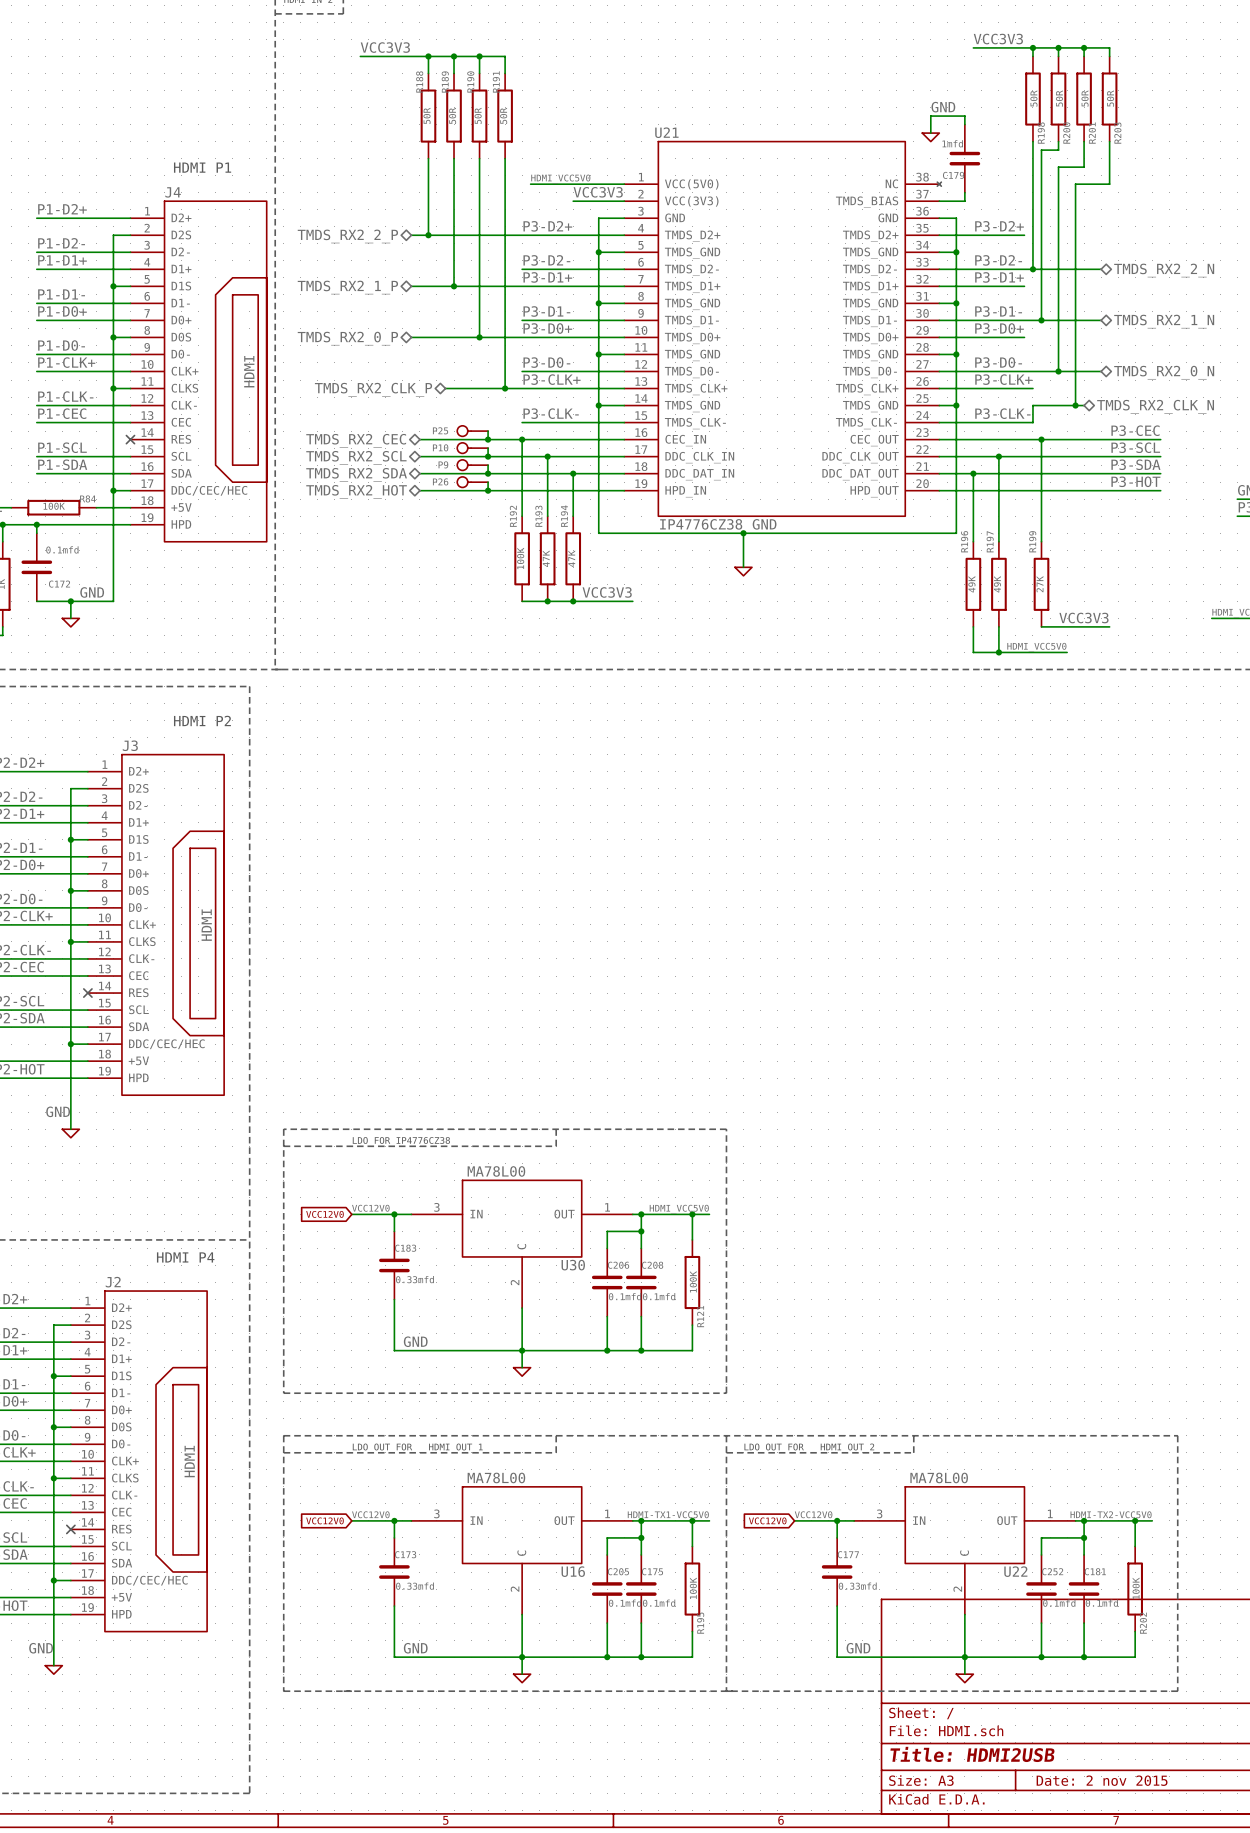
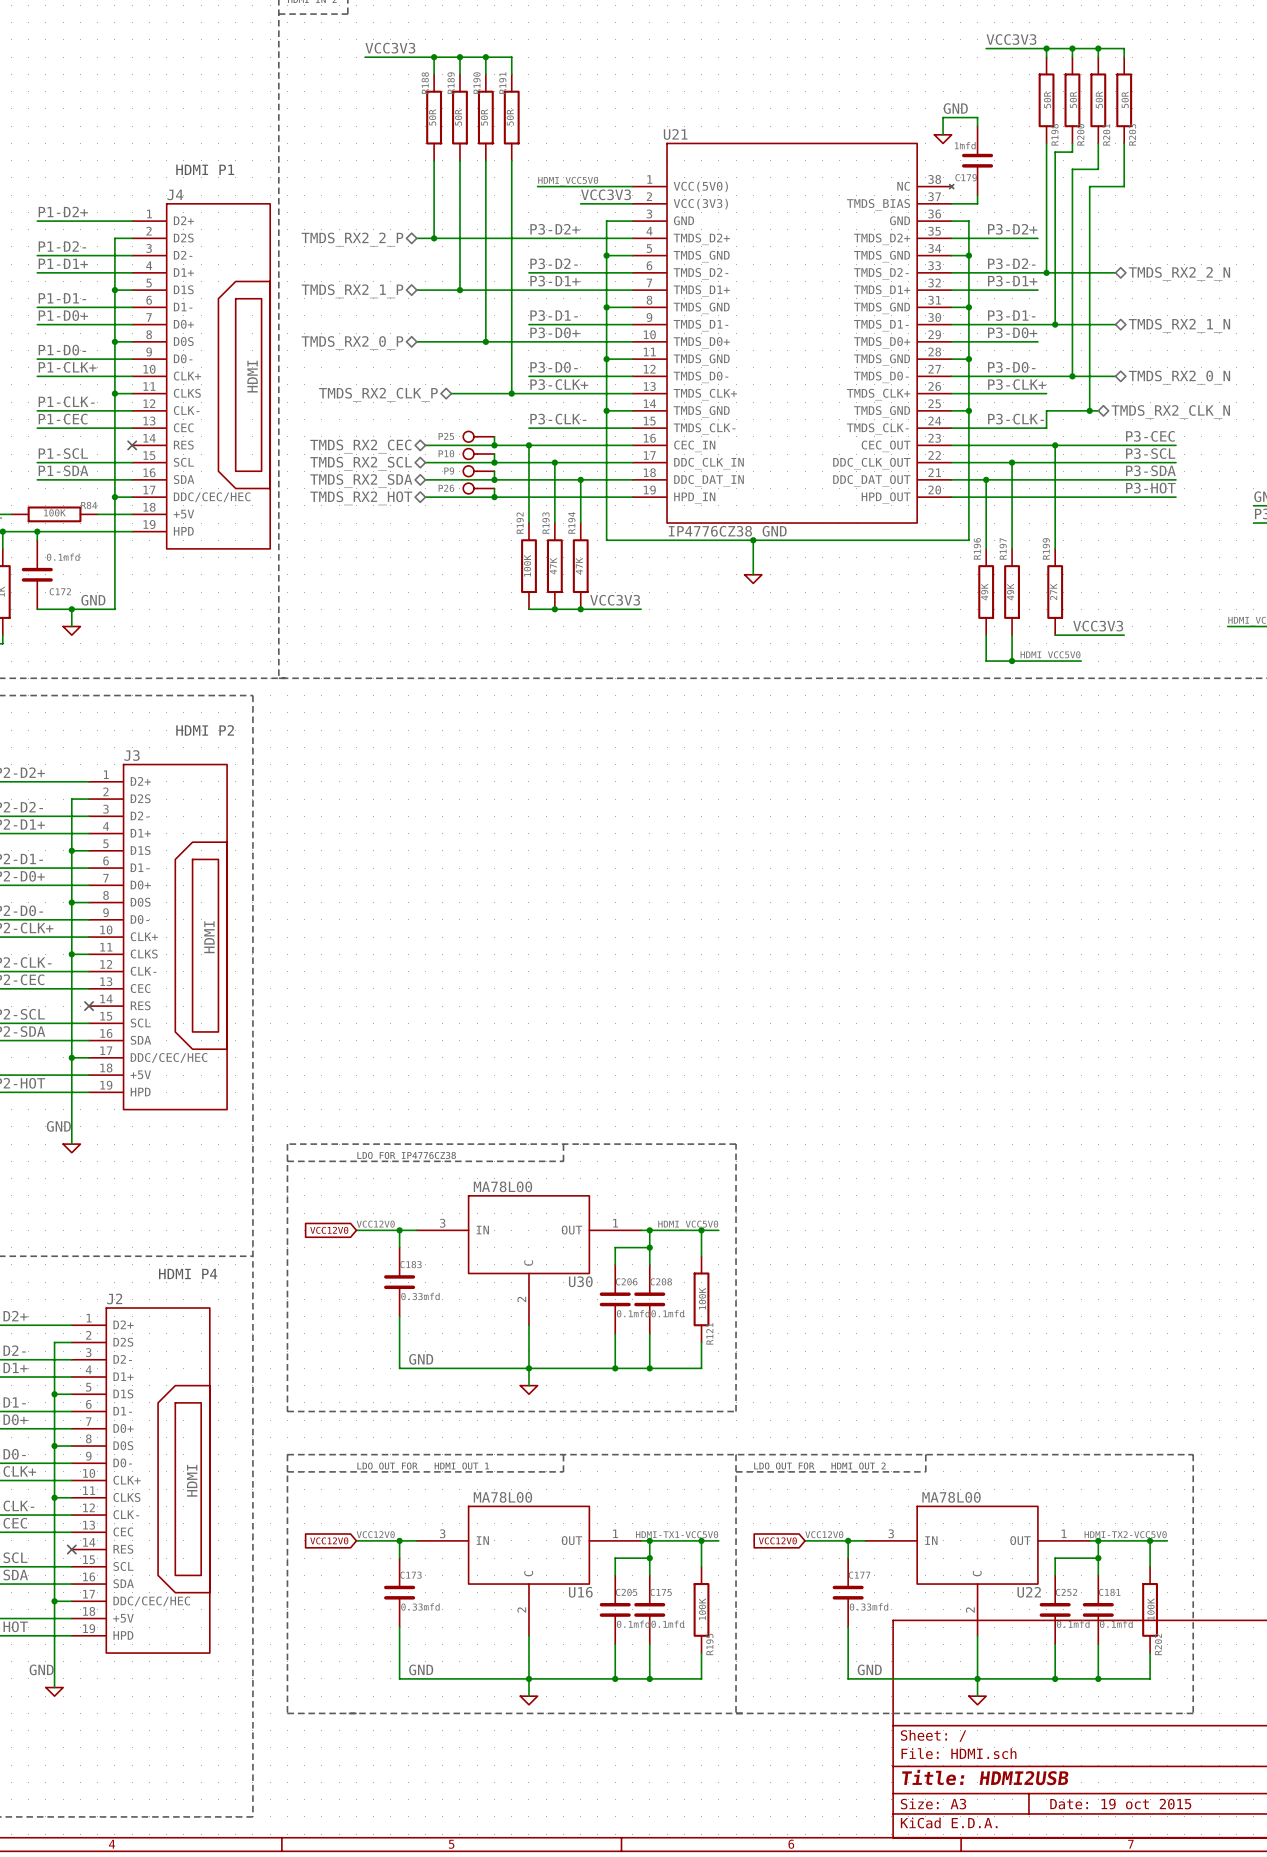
title block: Date: 2 nov 2015 (1102, 1780) -> Date: 19 oct 2015 (1120, 1804)

